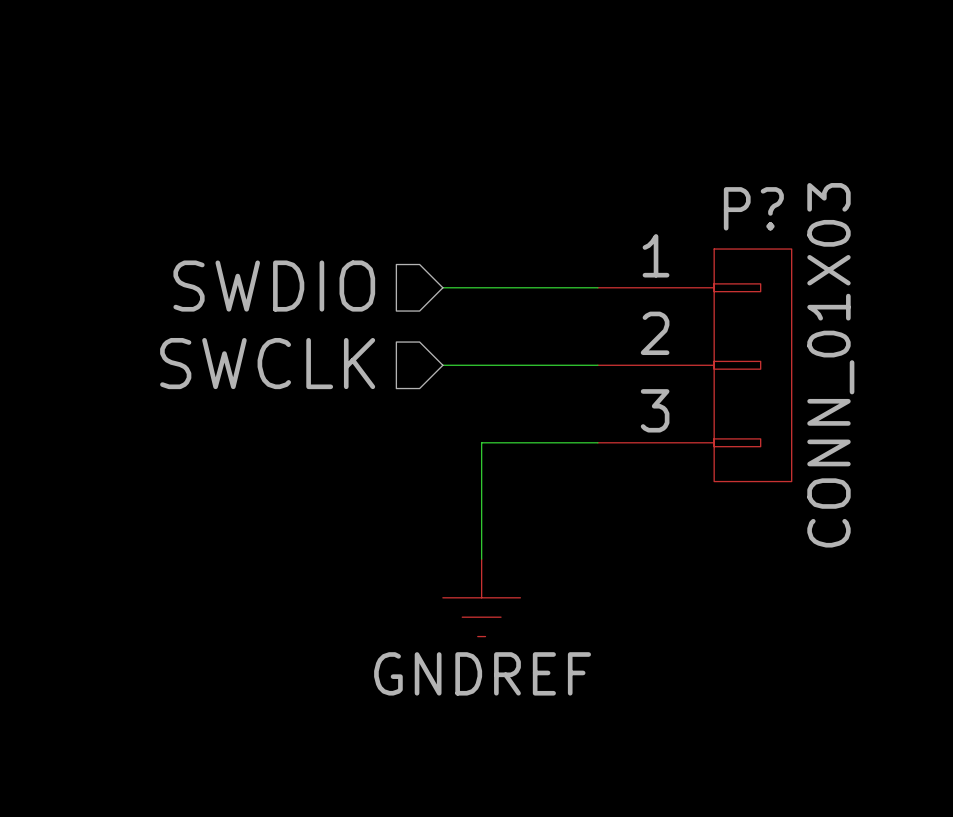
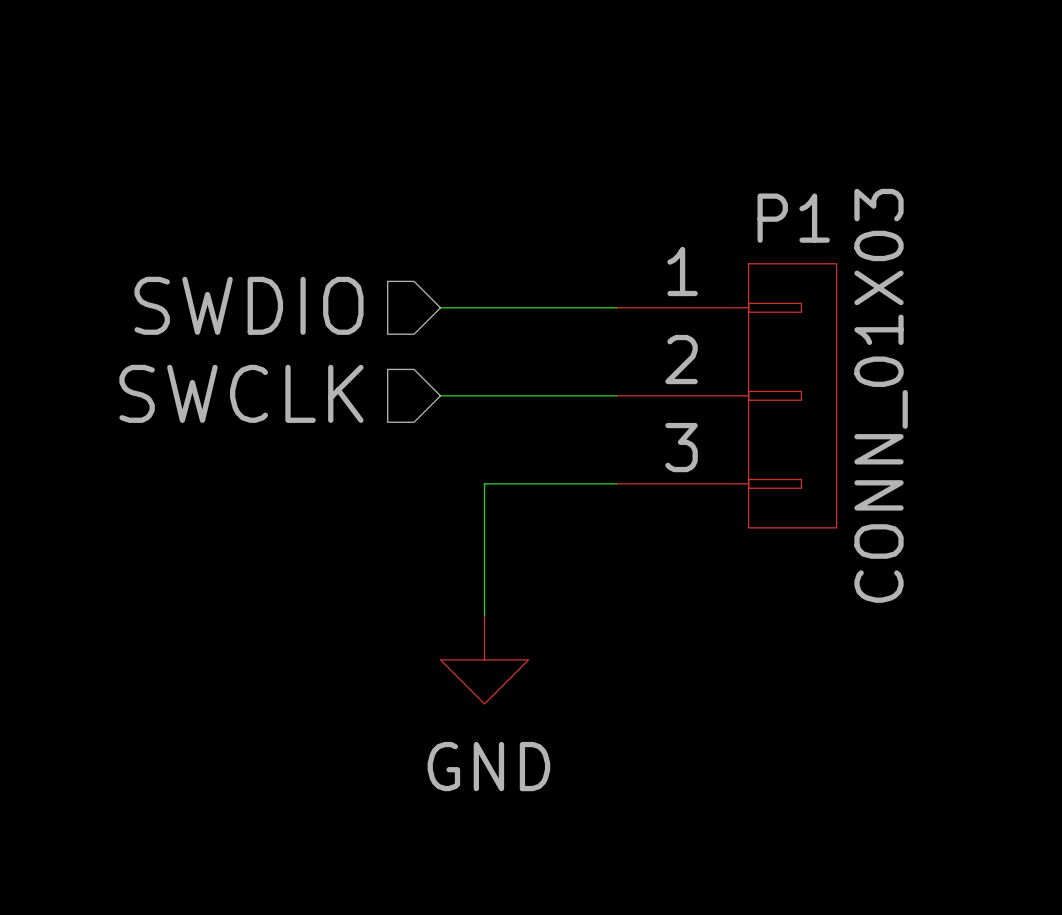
P? name: P? (753, 208) -> P1 (793, 218)
power symbol: GNDREF (481, 597) -> GND (484, 659)

